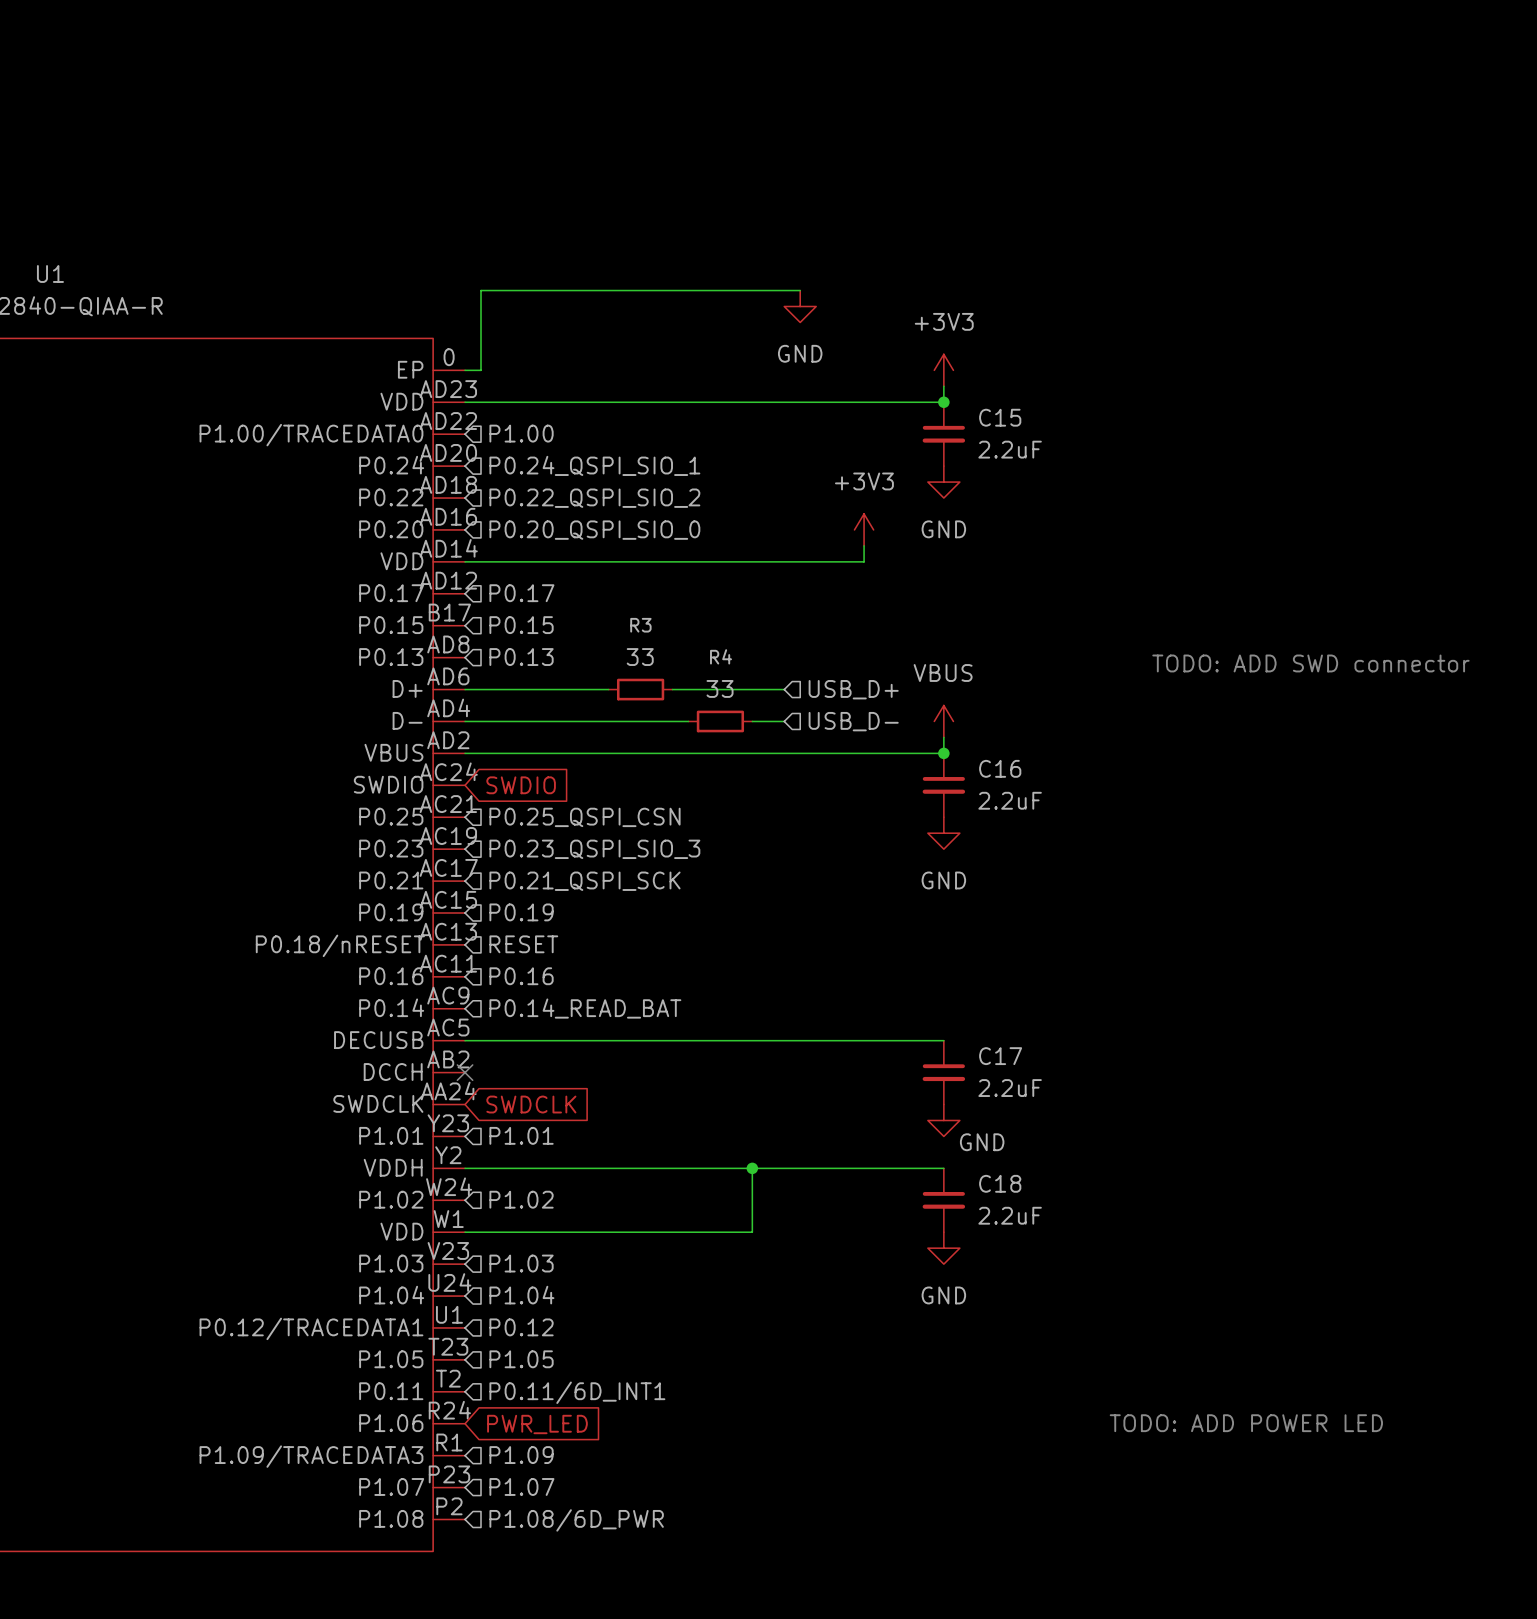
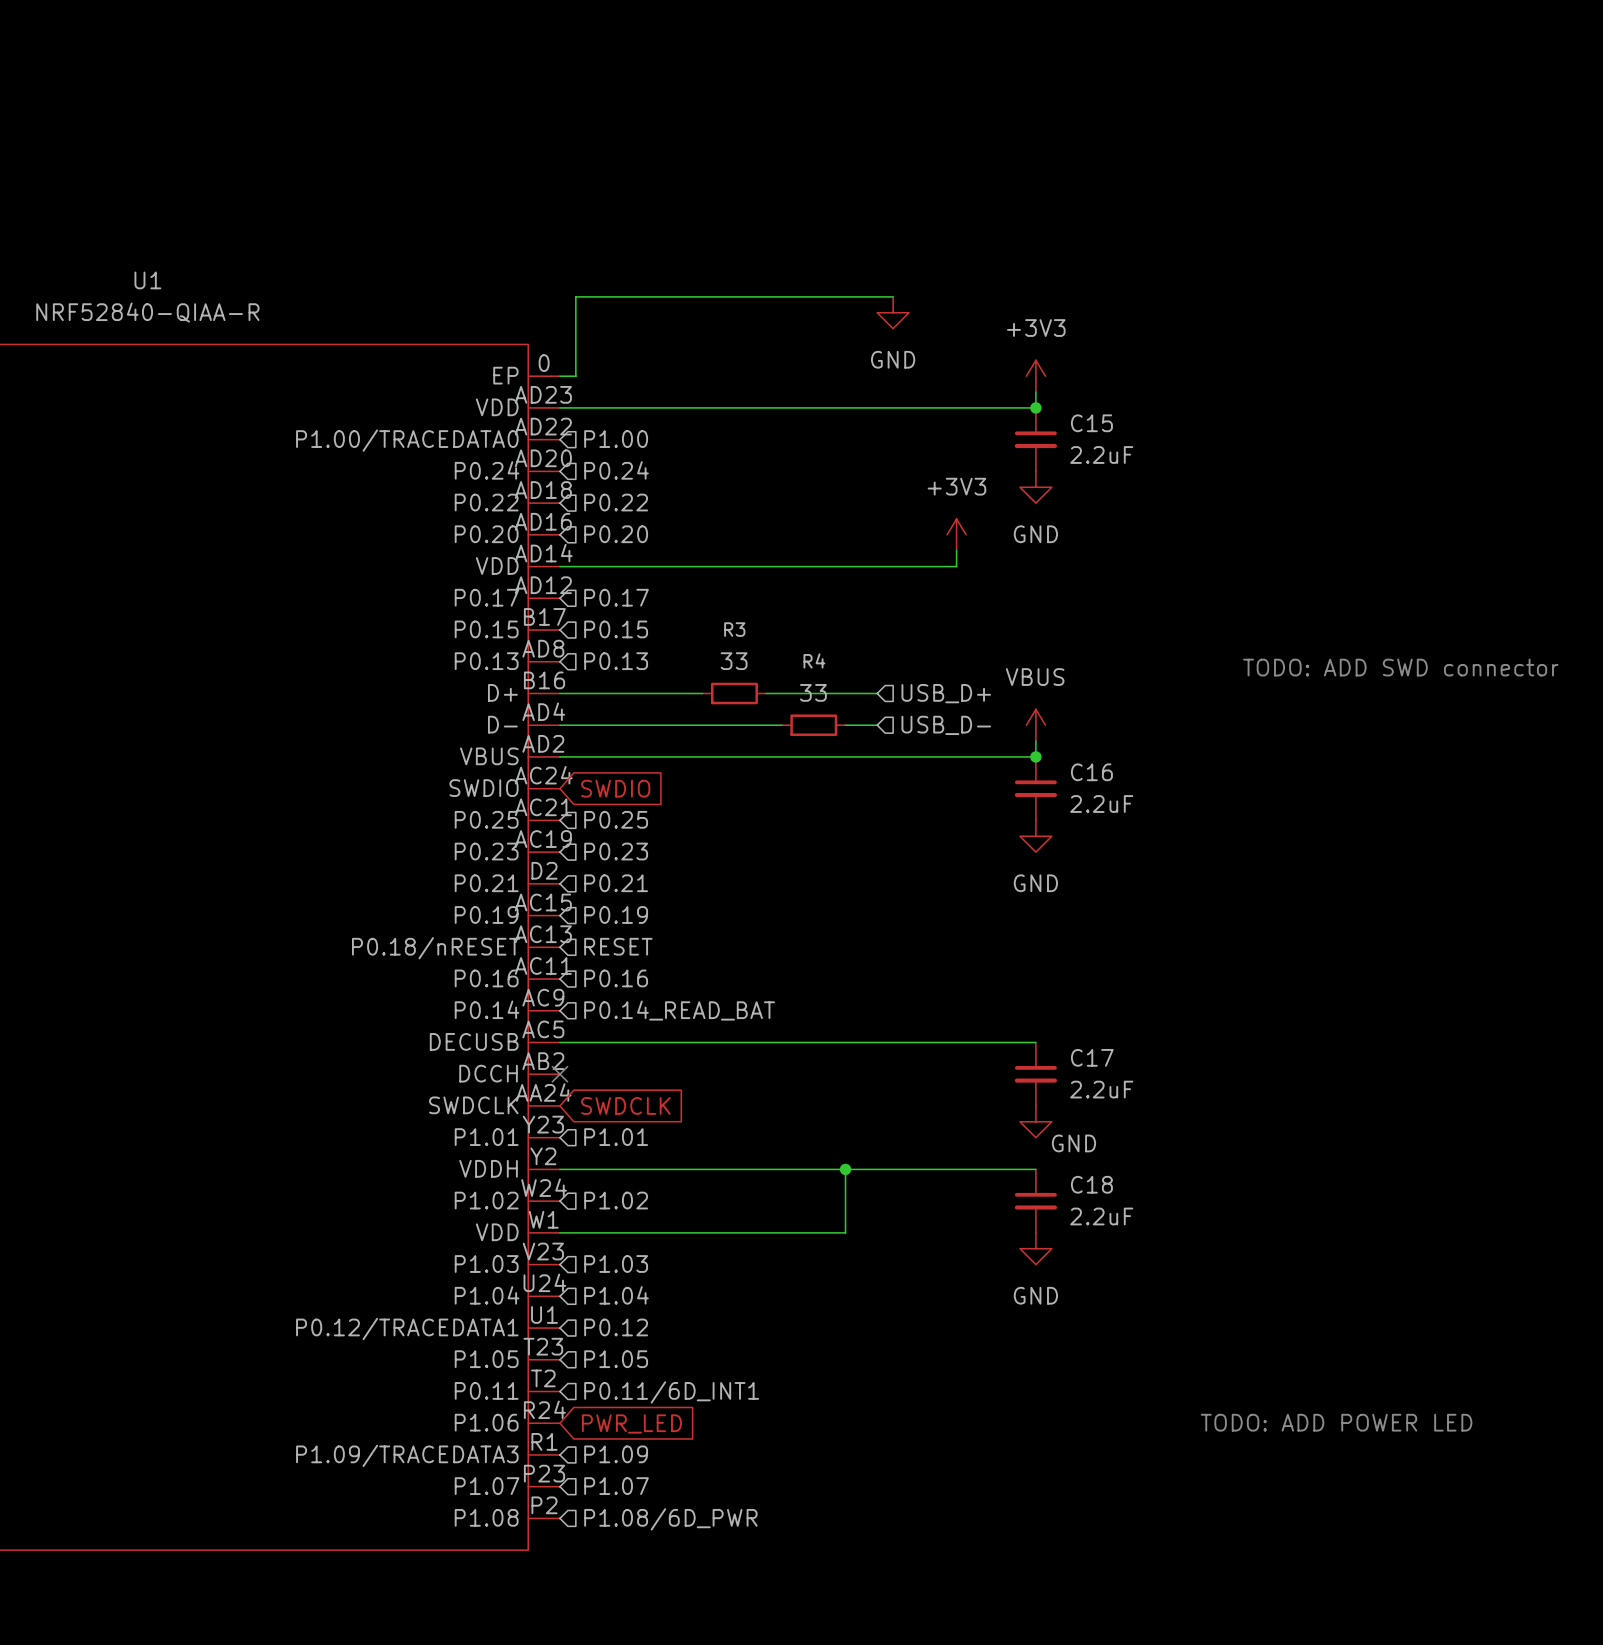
hierarchical label: P0.24_QSPI_SIO_1 (594, 465) -> P0.24 (616, 470)
hierarchical label: P0.22_QSPI_SIO_2 (594, 498) -> P0.22 (616, 502)
hierarchical label: P0.20_QSPI_SIO_0 (594, 530) -> P0.20 (616, 534)
U1 pin number: AD6 (448, 676) -> B16 (544, 680)
hierarchical label: P0.25_QSPI_CSN (584, 817) -> P0.25 (616, 819)
hierarchical label: P0.23_QSPI_SIO_3 (594, 849) -> P0.23 (616, 851)
U1 pin number: AC17 (448, 867) -> D2 (544, 870)
hierarchical label: P0.21_QSPI_SCK (584, 881) -> P0.21 (616, 883)

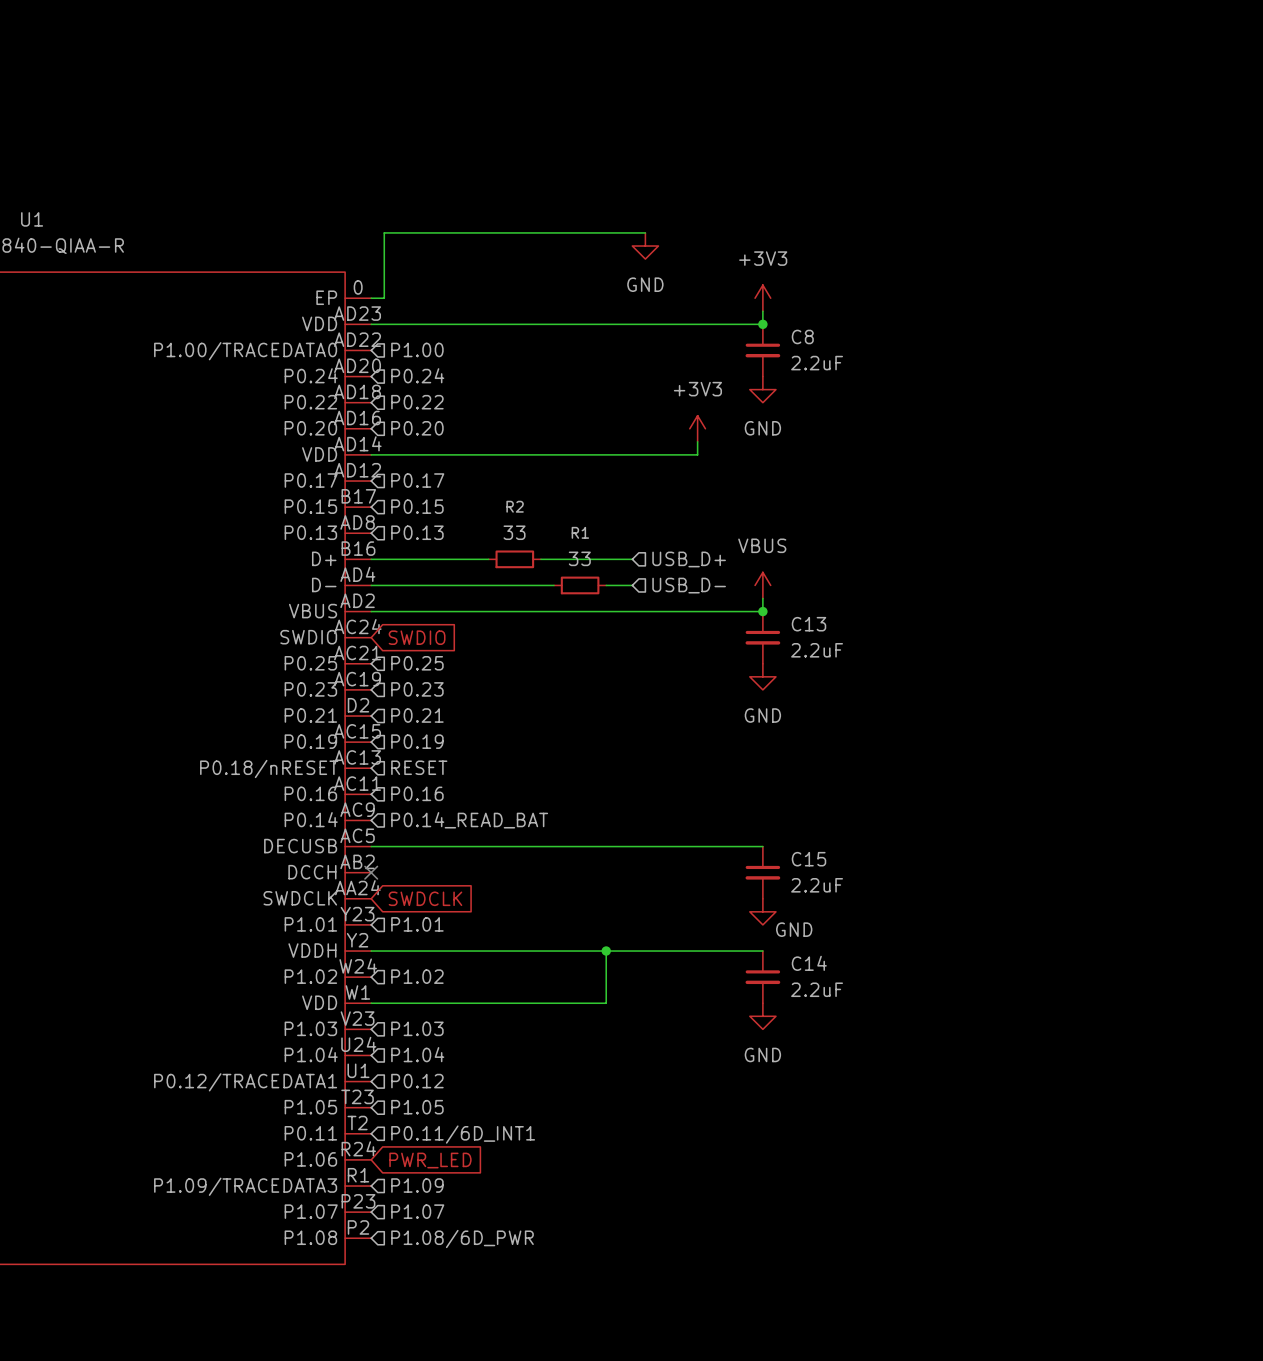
C15 name: C15 (1091, 423) -> C8 (802, 336)
R3 name: R3 (734, 629) -> R2 (515, 506)
R4 name: R4 (814, 660) -> R1 (580, 532)
text: TODO: ADD SWD connector (1400, 667) -> none
C16 name: C16 (1091, 772) -> C13 (808, 624)
C17 name: C17 (1092, 1057) -> C15 (808, 859)
C18 name: C18 (1091, 1184) -> C14 (809, 963)
text: TODO: ADD POWER LED (1336, 1422) -> none

